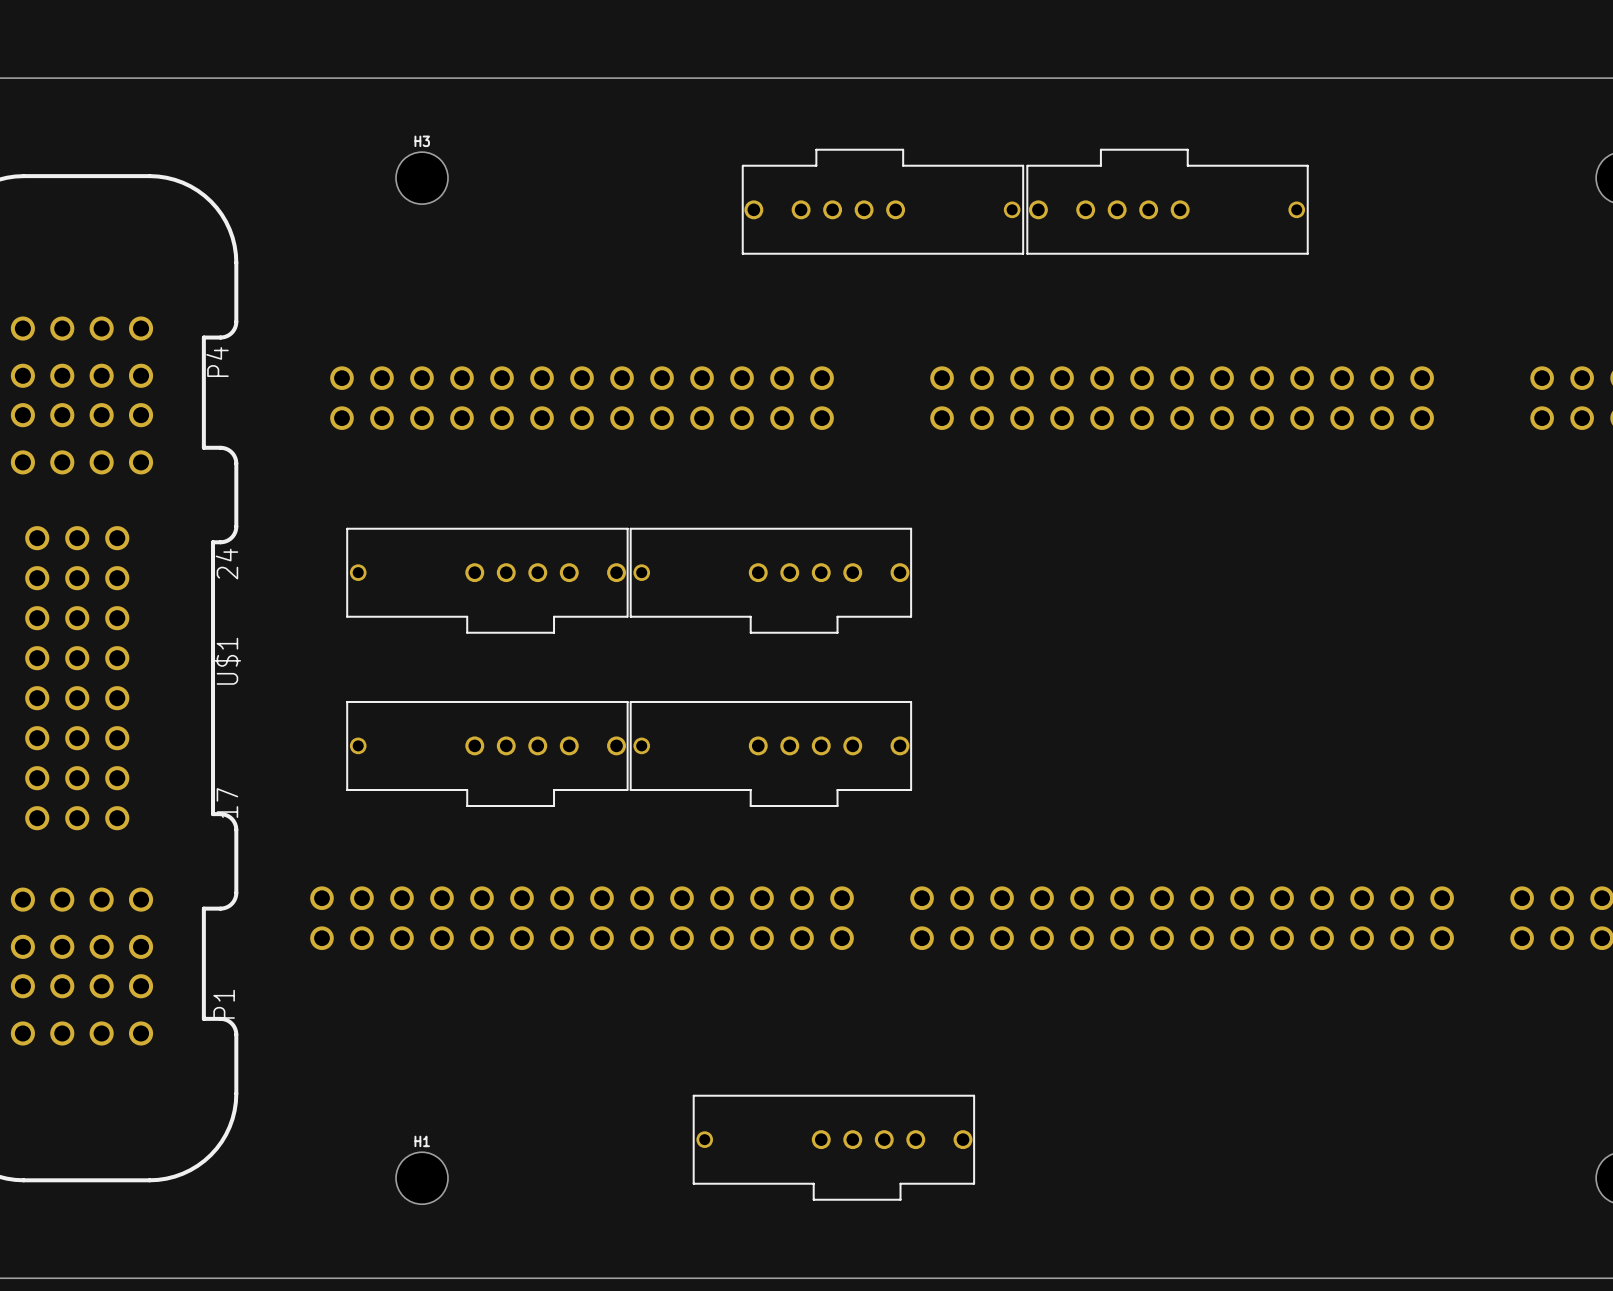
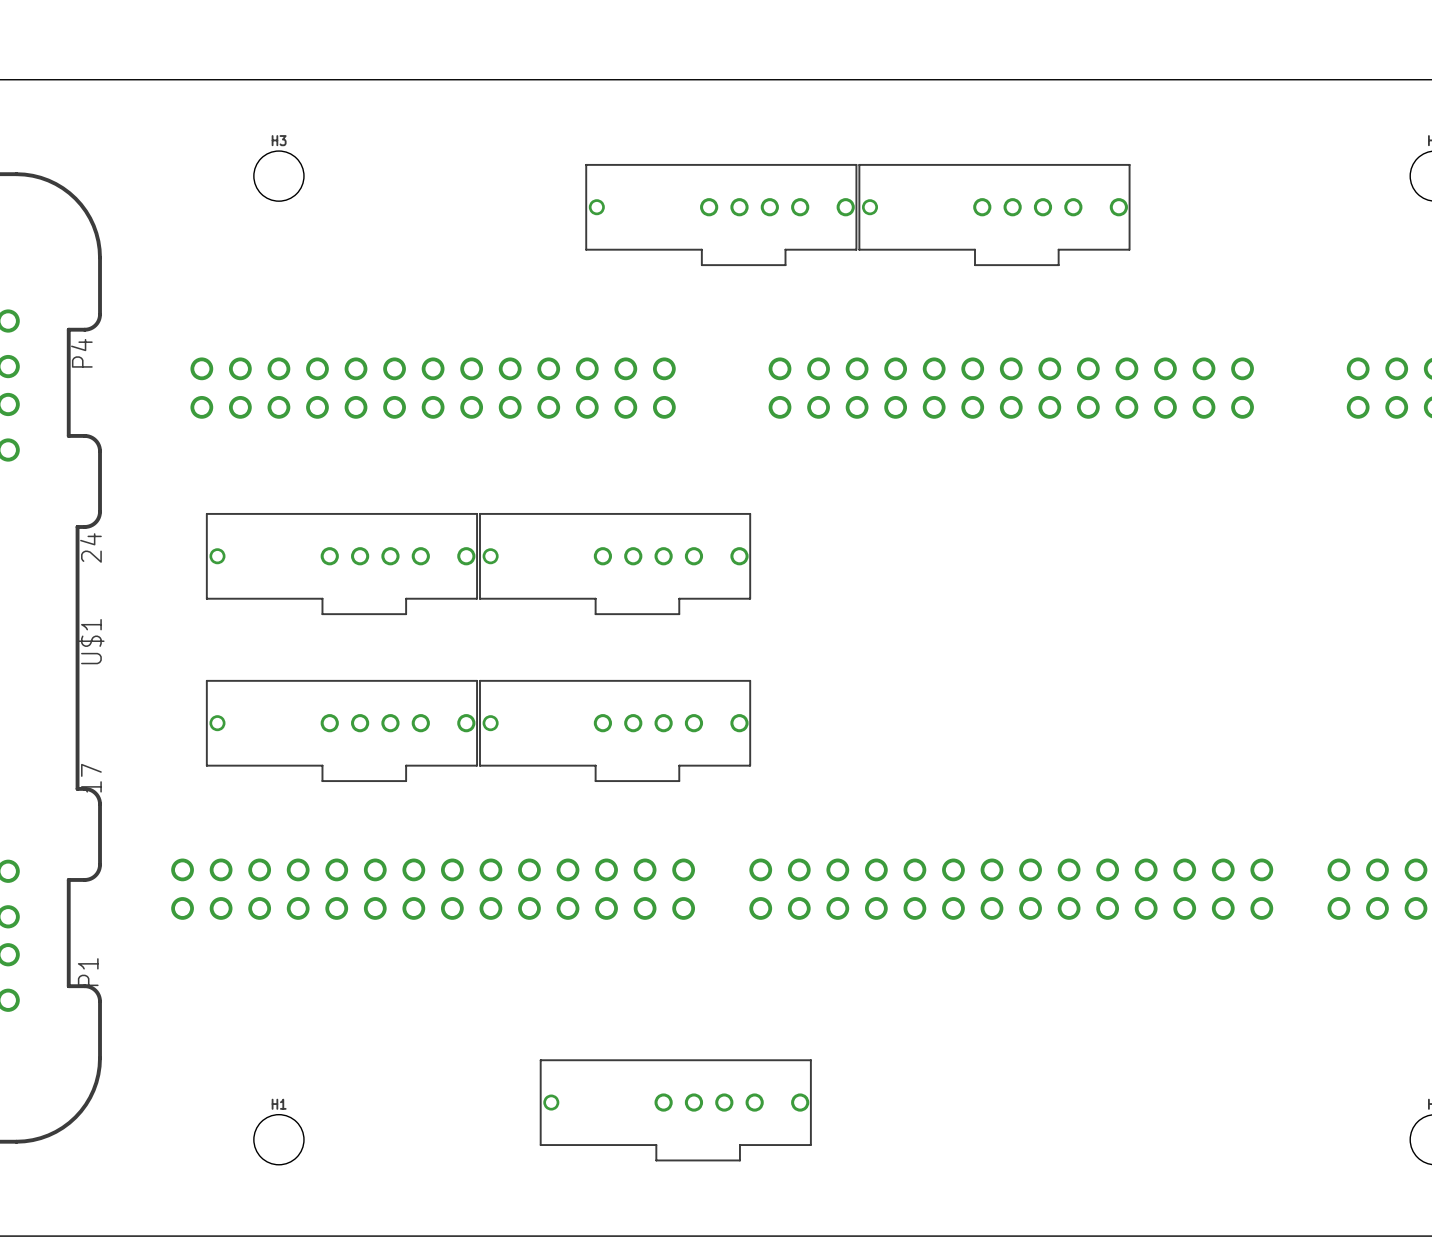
part rotation: 0° (882, 201) -> 180° (721, 215)
part rotation: 0° (1167, 201) -> 180° (994, 215)

